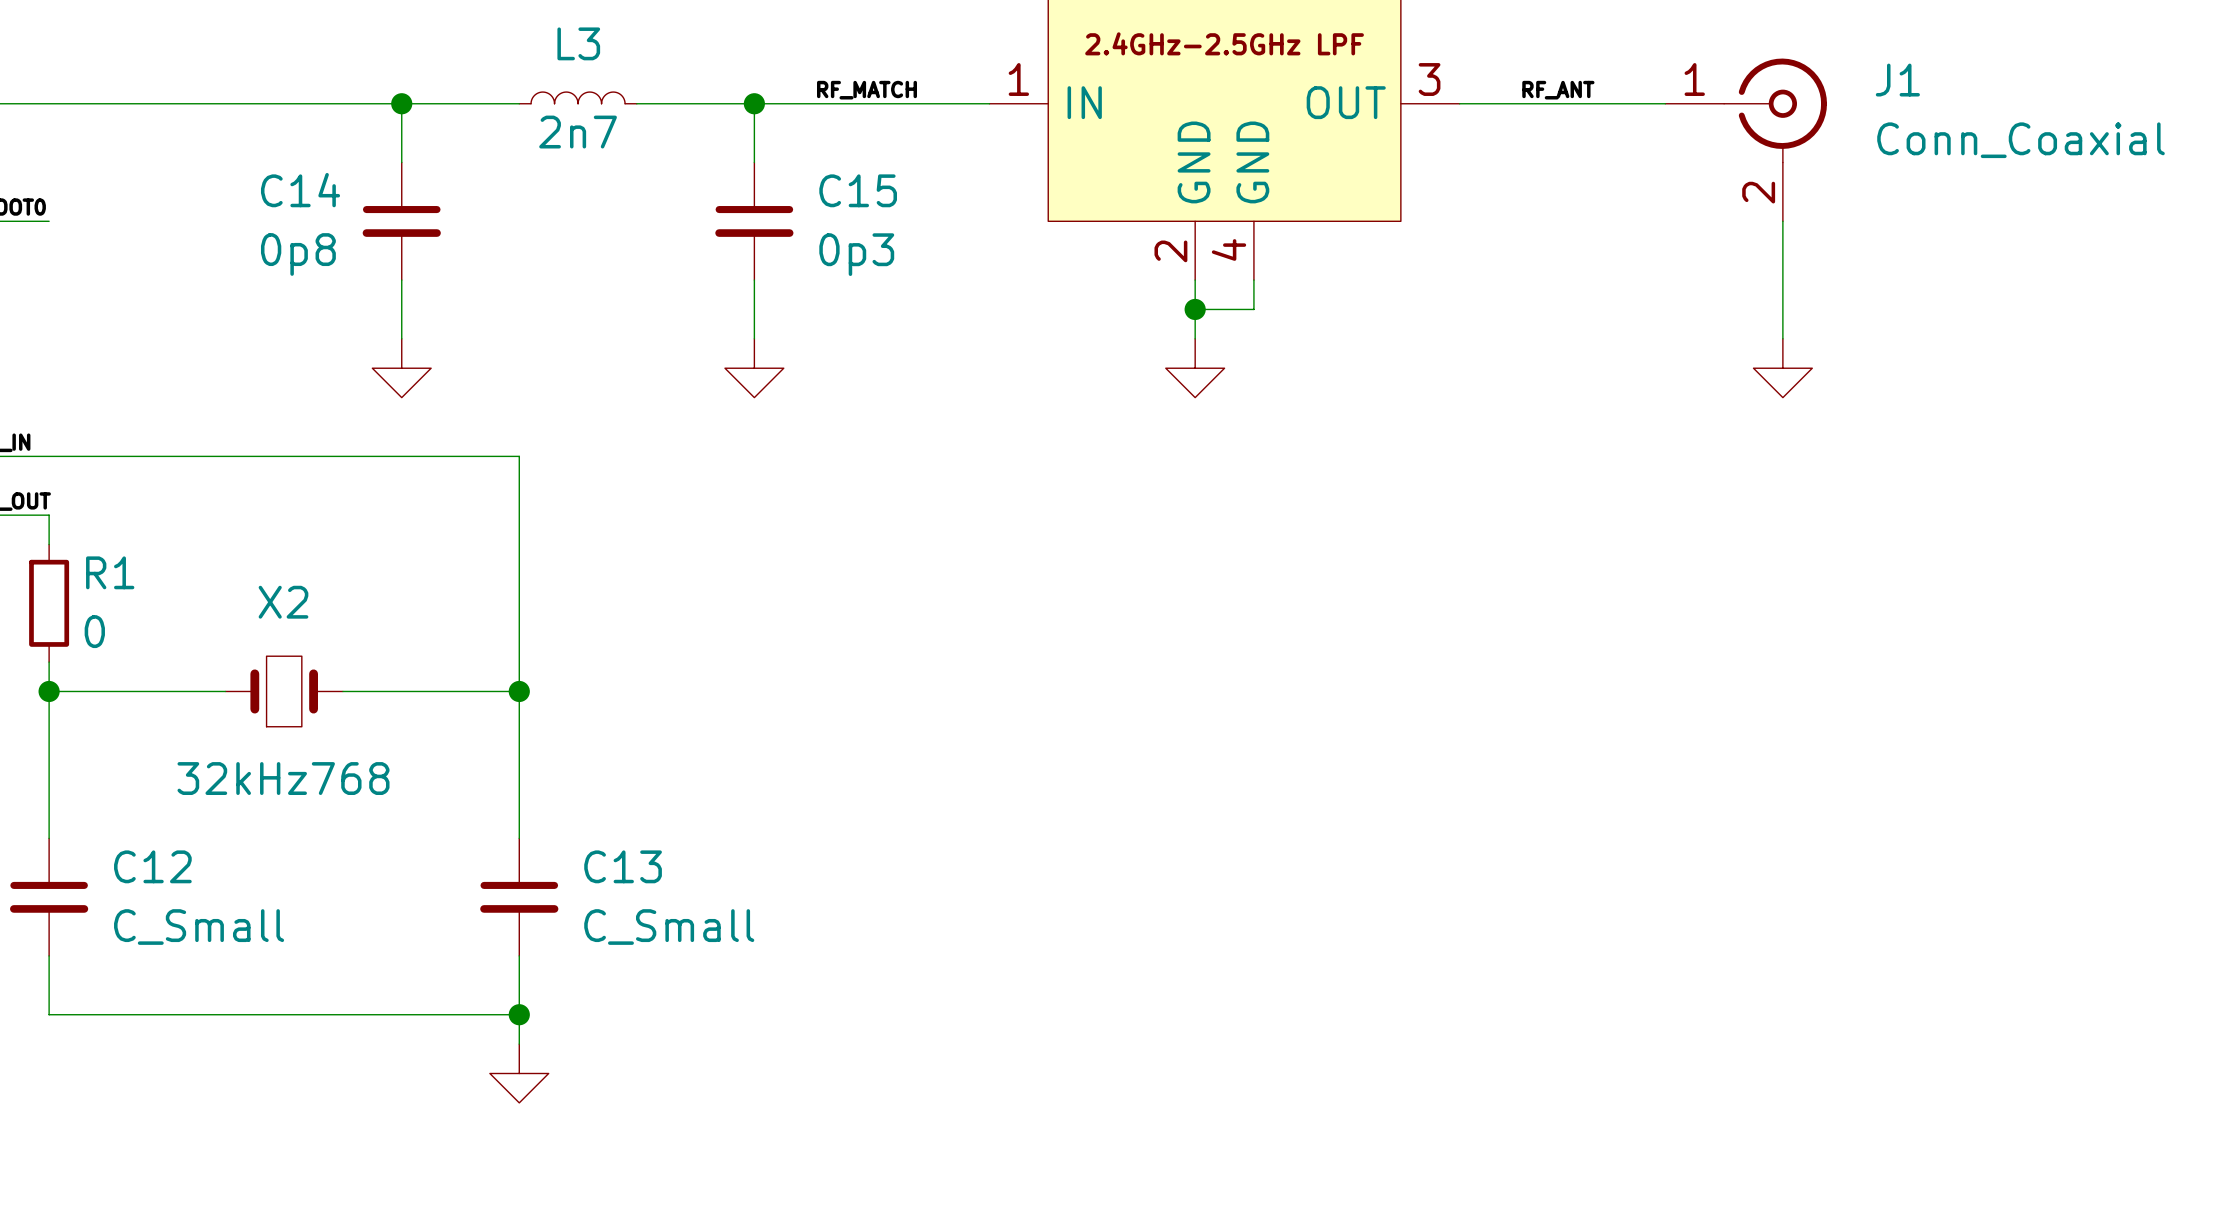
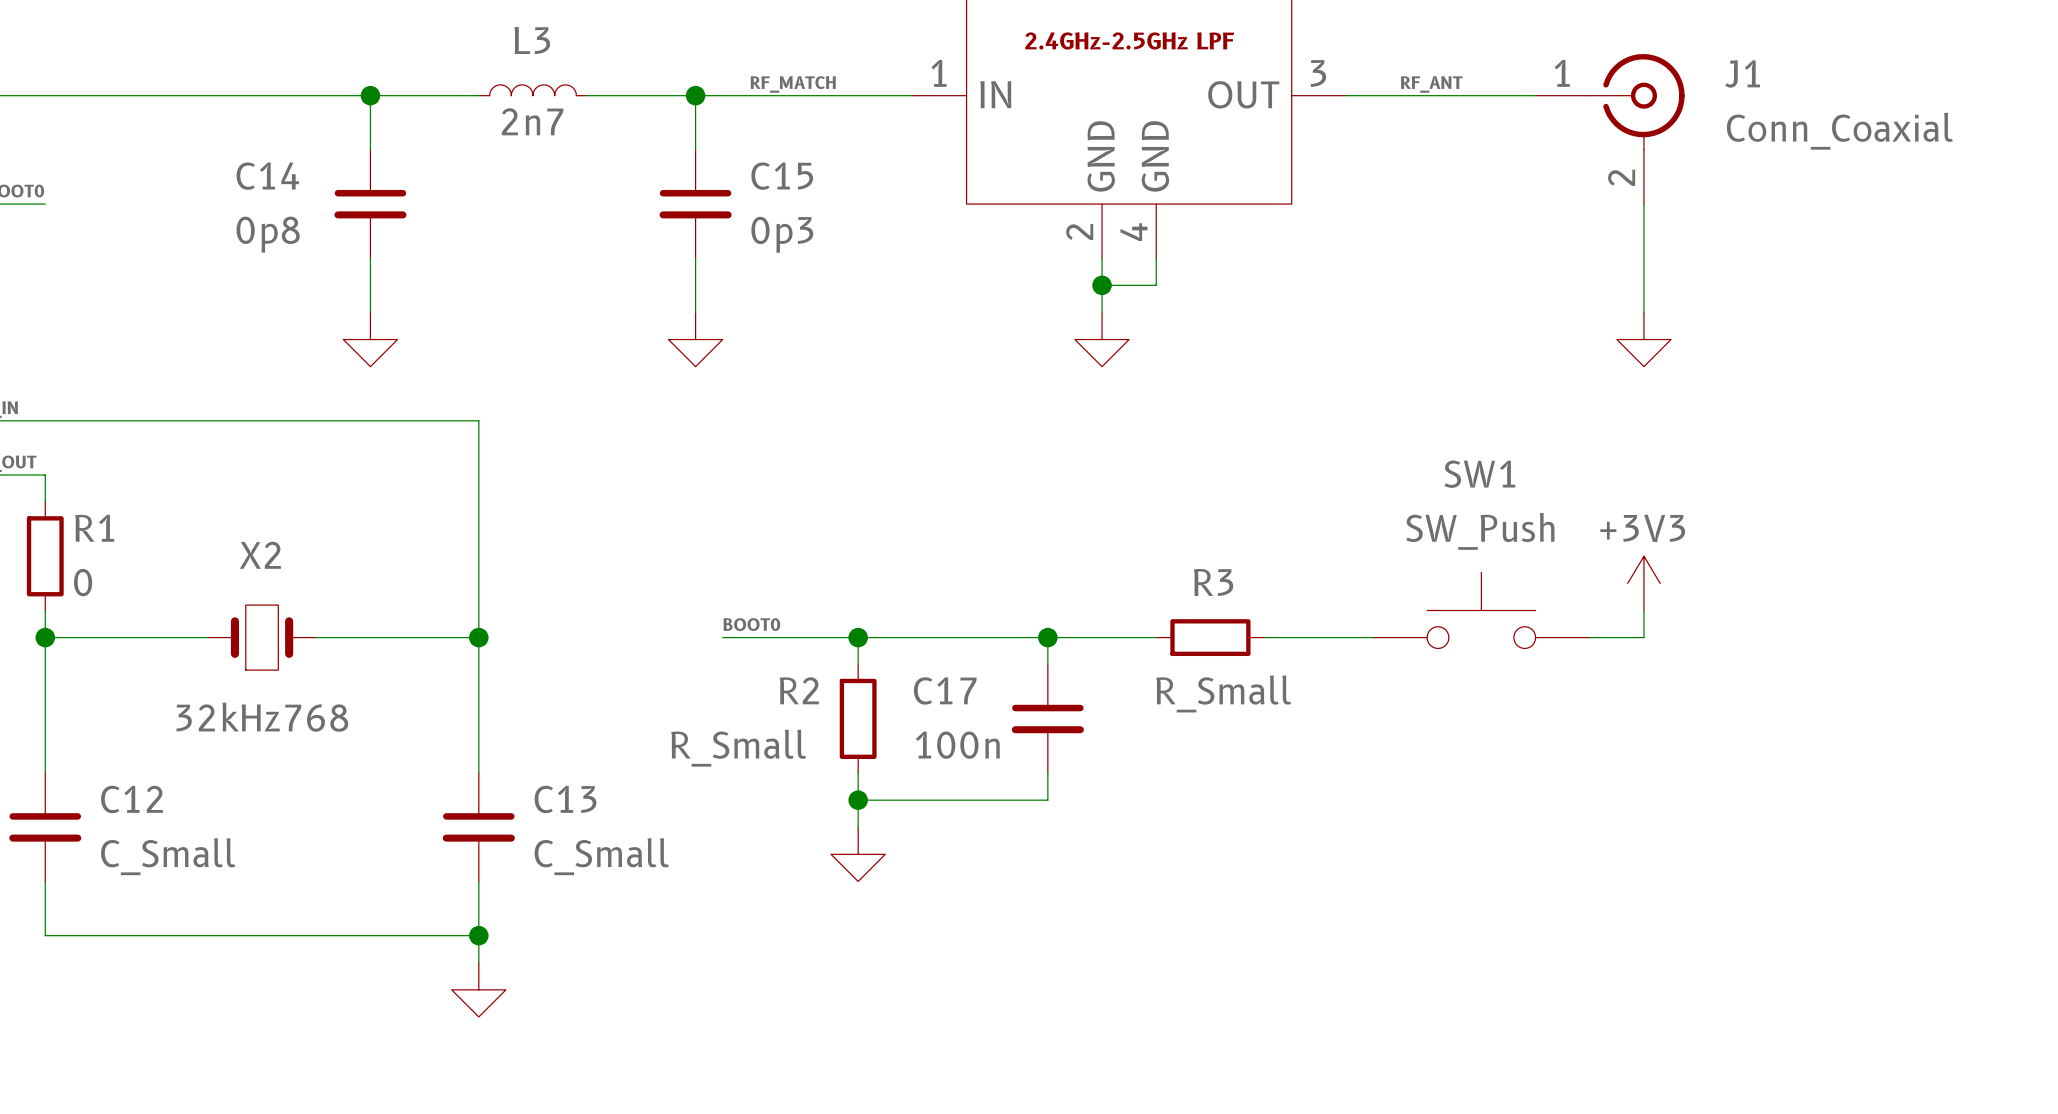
power symbol: none -> +3V3 (1643, 583)
SW1: none -> SW_Push (1481, 610)
wire: none -> (1643, 610) (1643, 637) (1589, 637)
label: none -> BOOT0 (751, 624)
wire: none -> (722, 637) (1156, 637)
wire: none -> (858, 637) (858, 664)
junction: none -> (858, 637)
wire: none -> (1047, 637) (1047, 664)
junction: none -> (1047, 637)
R3: none -> R_Small (1210, 637)
wire: none -> (1264, 637) (1373, 637)
R2: none -> R_Small (858, 718)
C17: none -> 100n (1047, 718)
wire: none -> (858, 773) (858, 827)
wire: none -> (1047, 773) (1047, 800) (858, 800)
junction: none -> (858, 800)
power symbol: none -> (858, 854)

